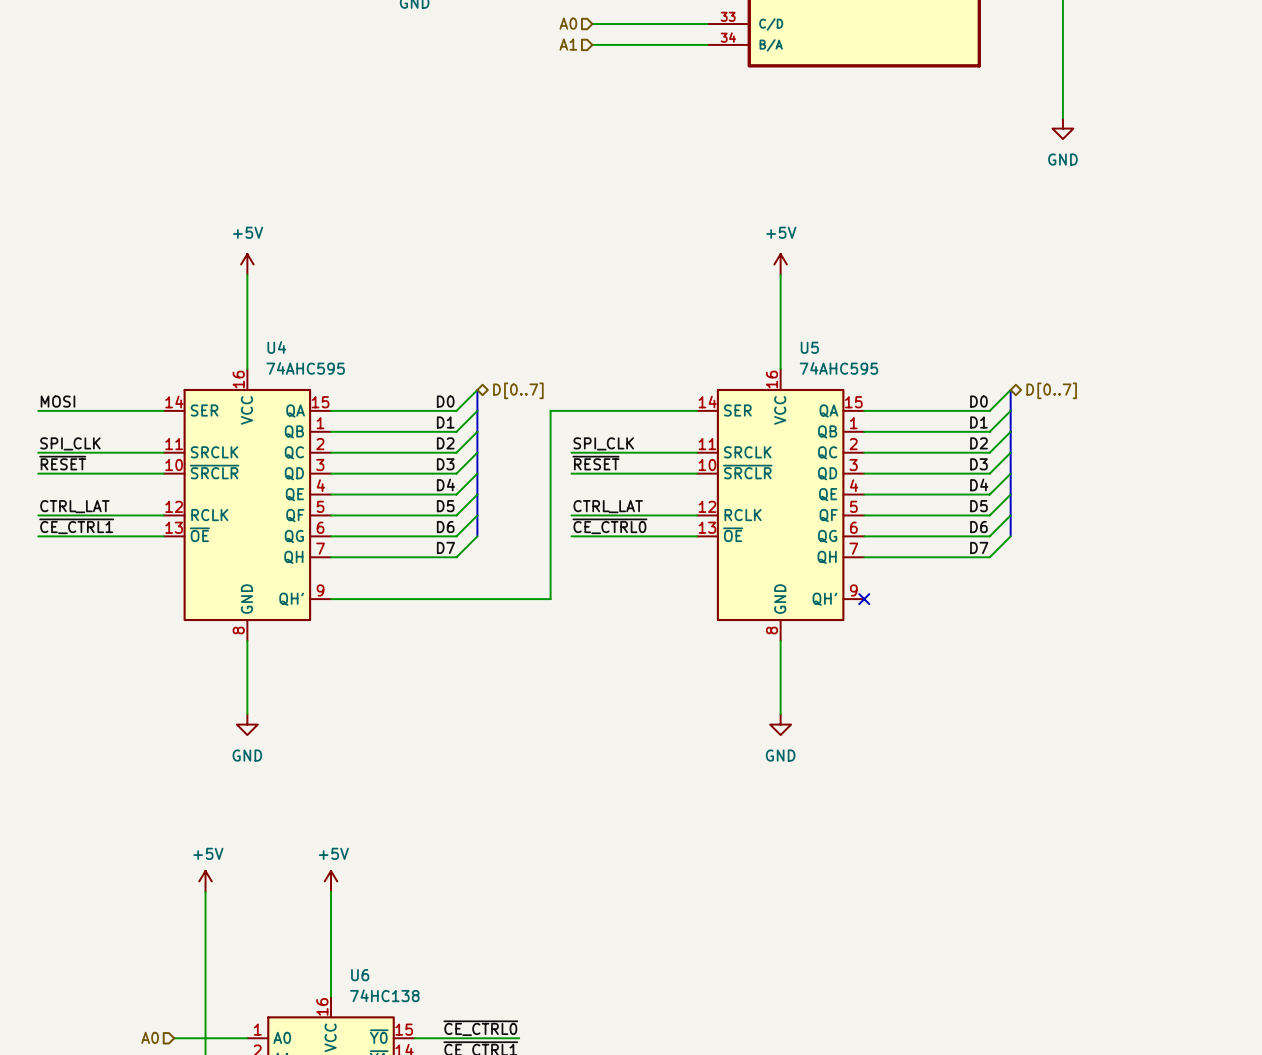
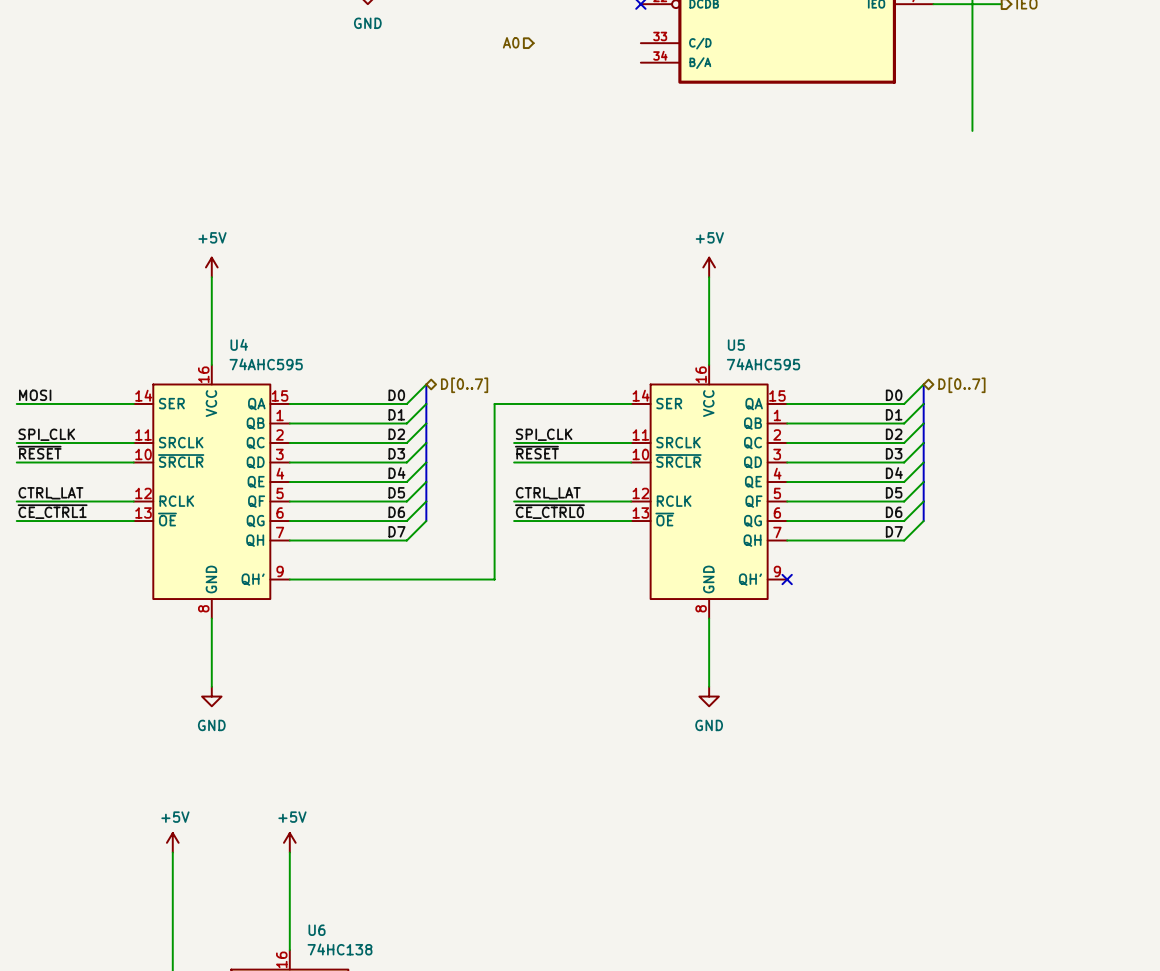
wire: (592, 24) (707, 24) -> none
hierarchical label: A1 (568, 44) -> none
wire: (592, 44) (707, 44) -> none
power symbol: GND (1062, 128) -> none

